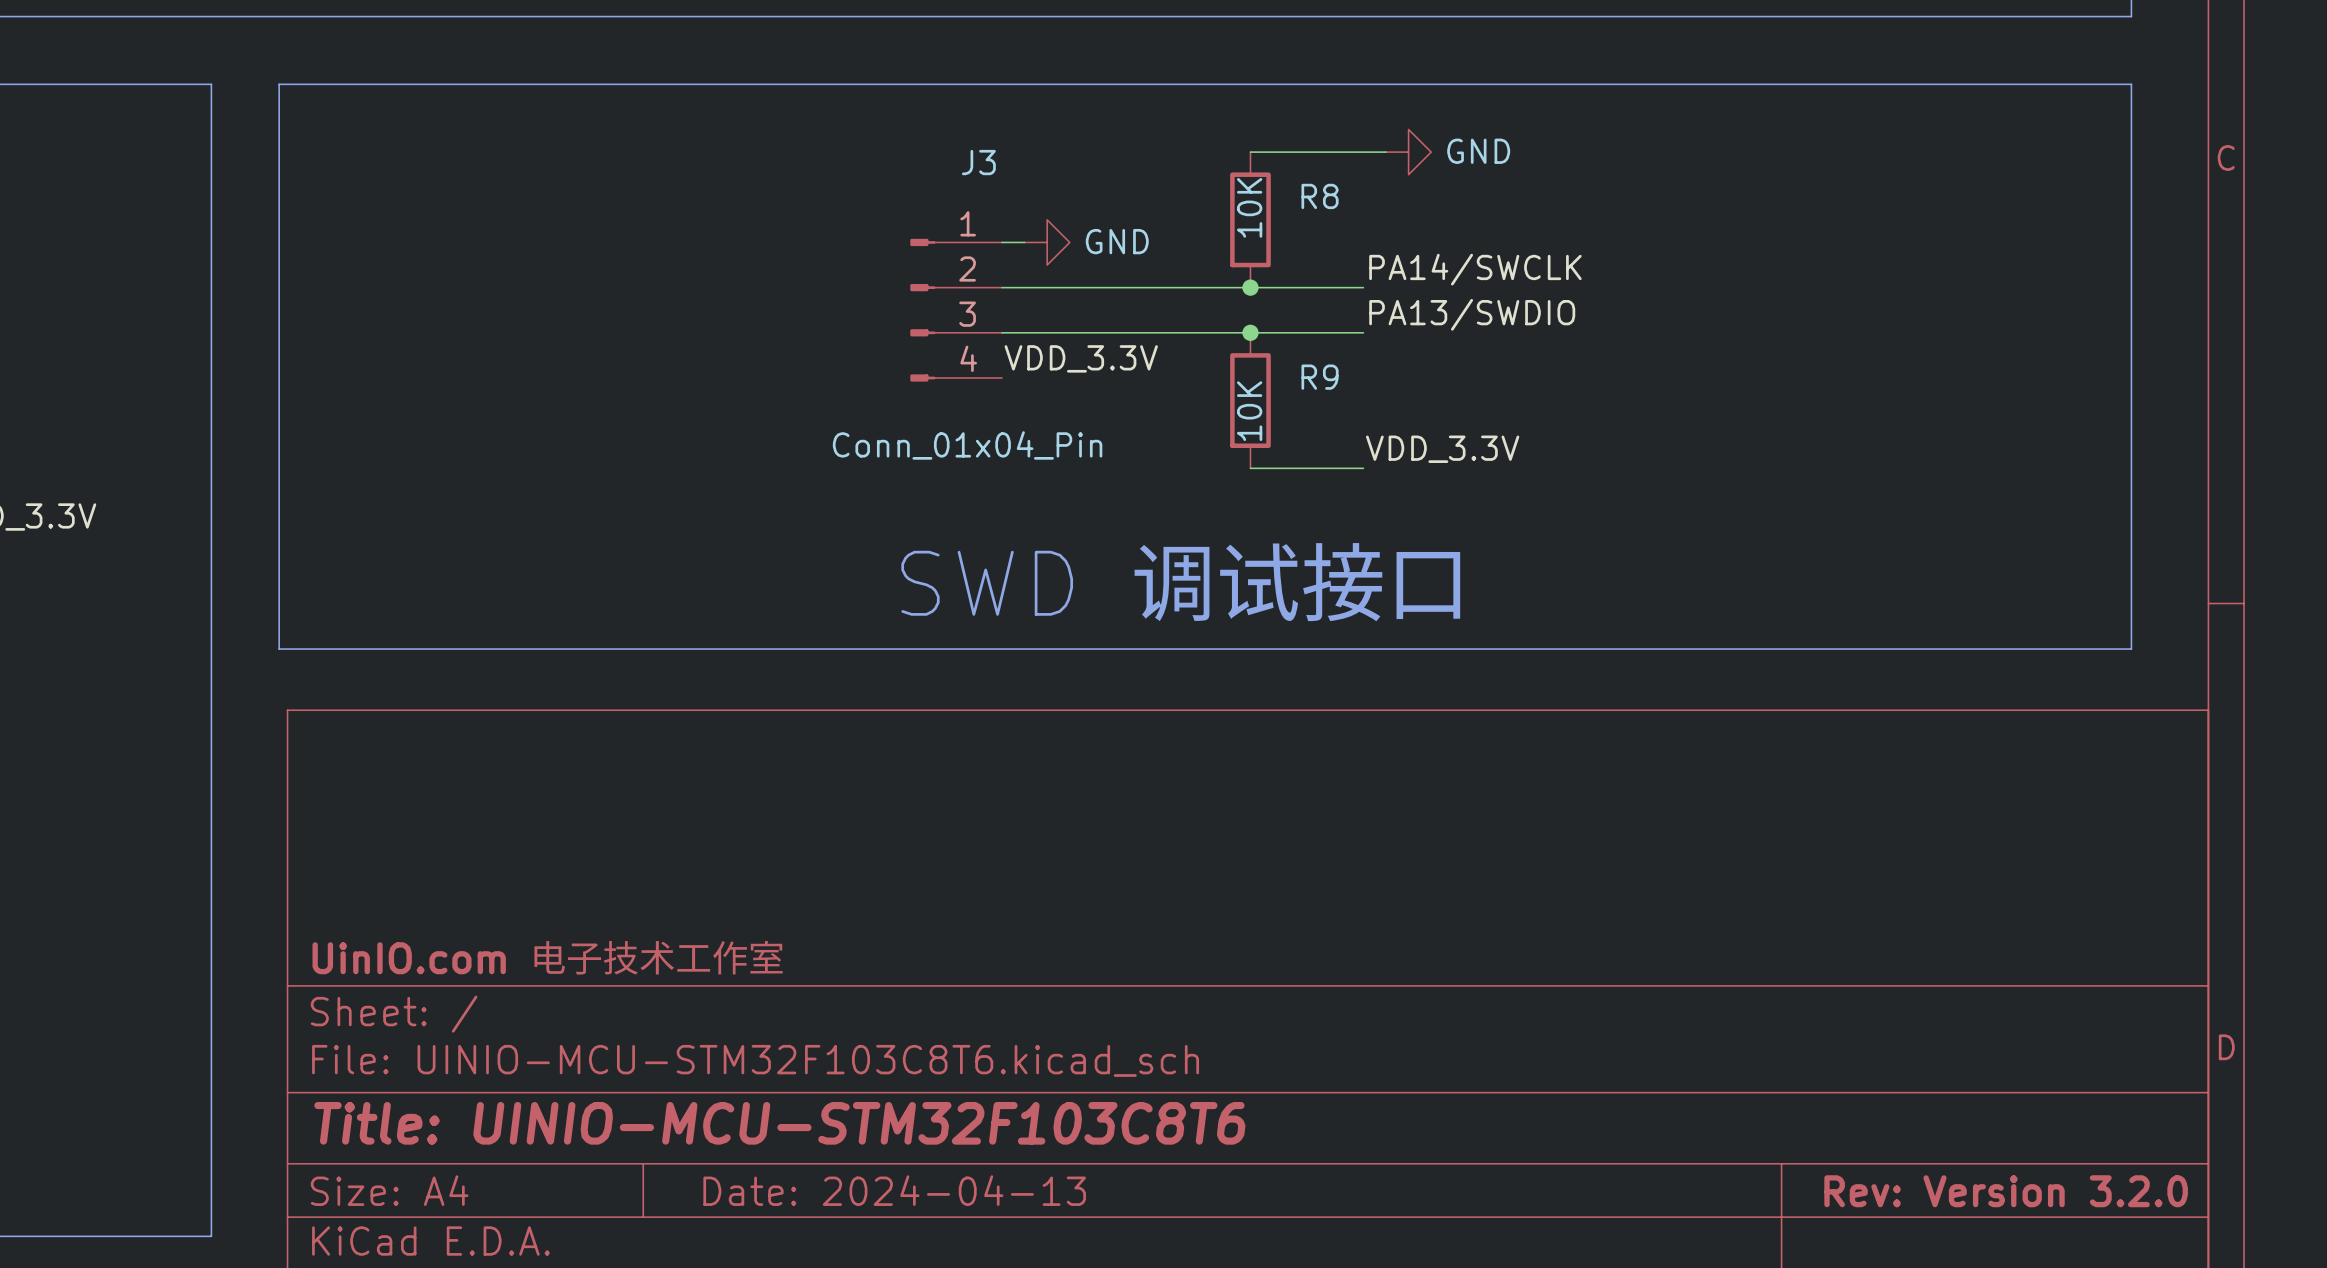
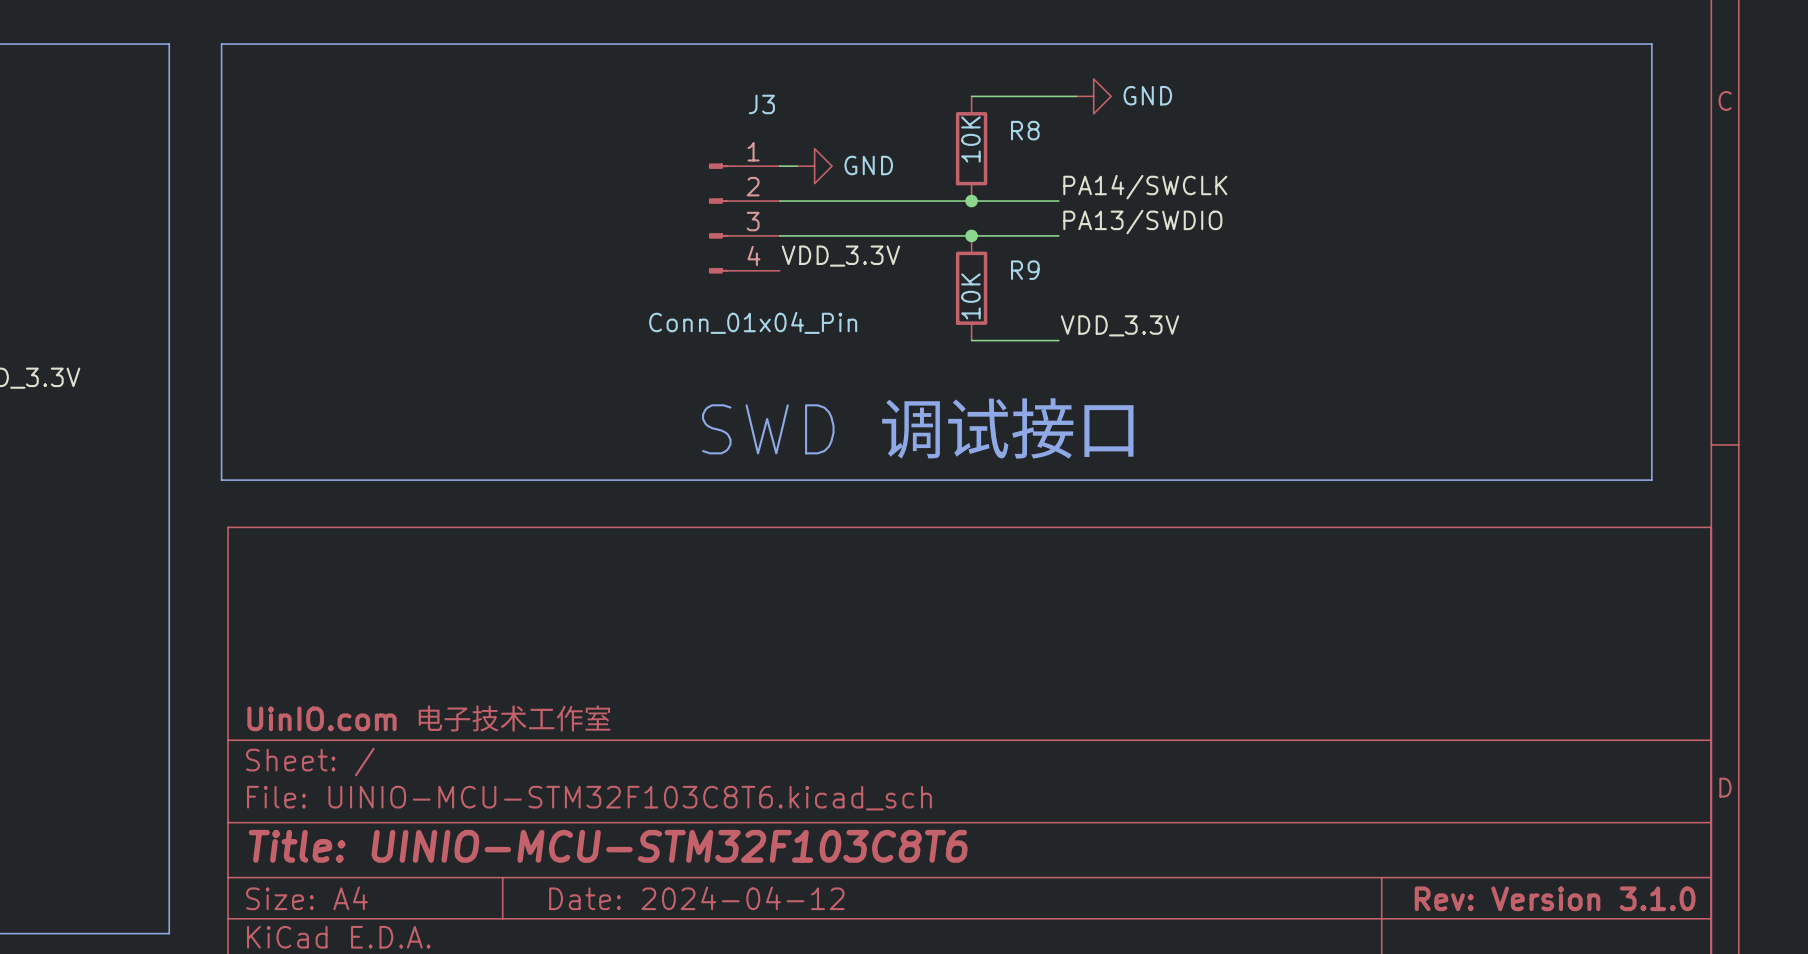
title block: Date: 2024-04-13 (894, 1190) -> Date: 2024-04-12 (696, 898)
title block: Rev: Version 3.2.0 (2006, 1191) -> Rev: Version 3.1.0 (1555, 898)

